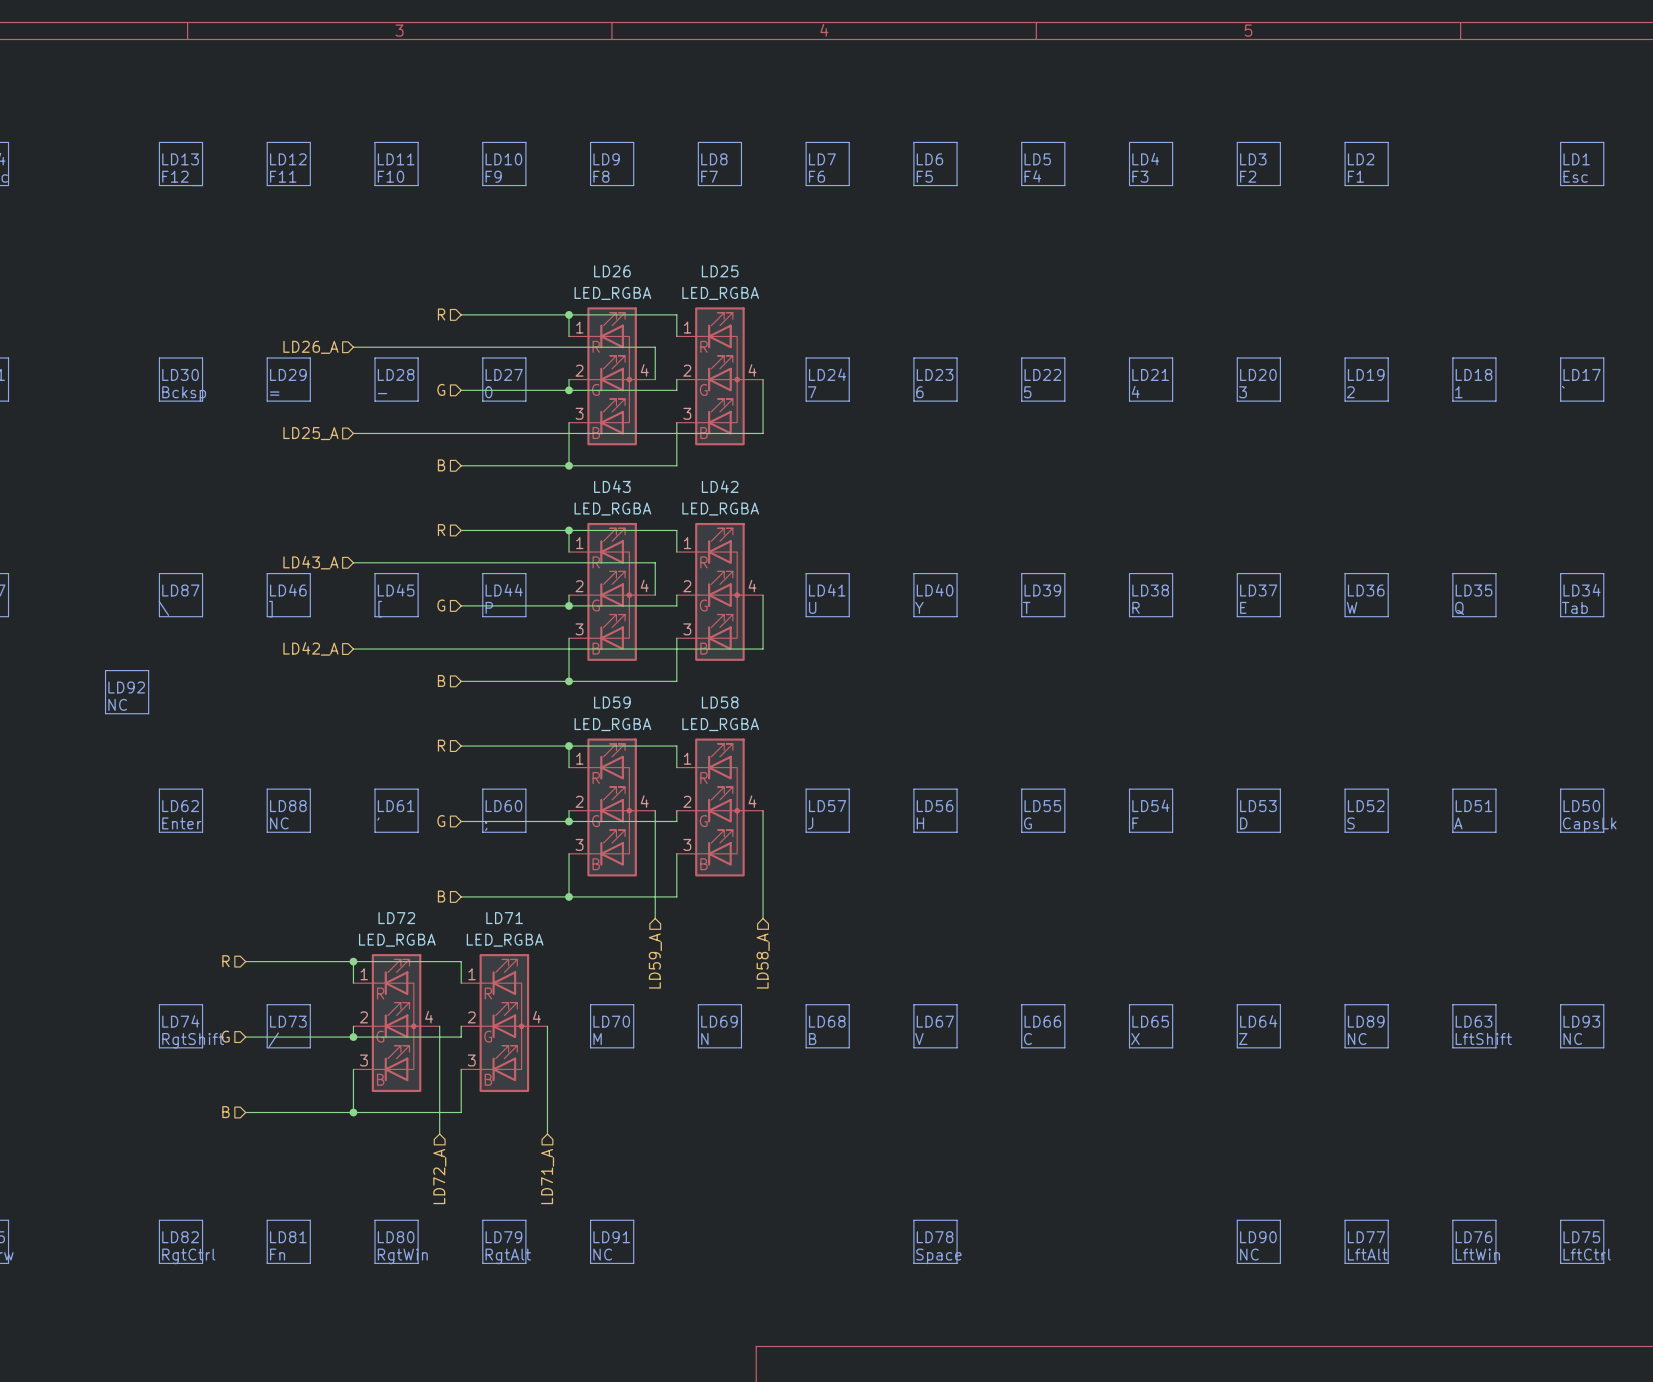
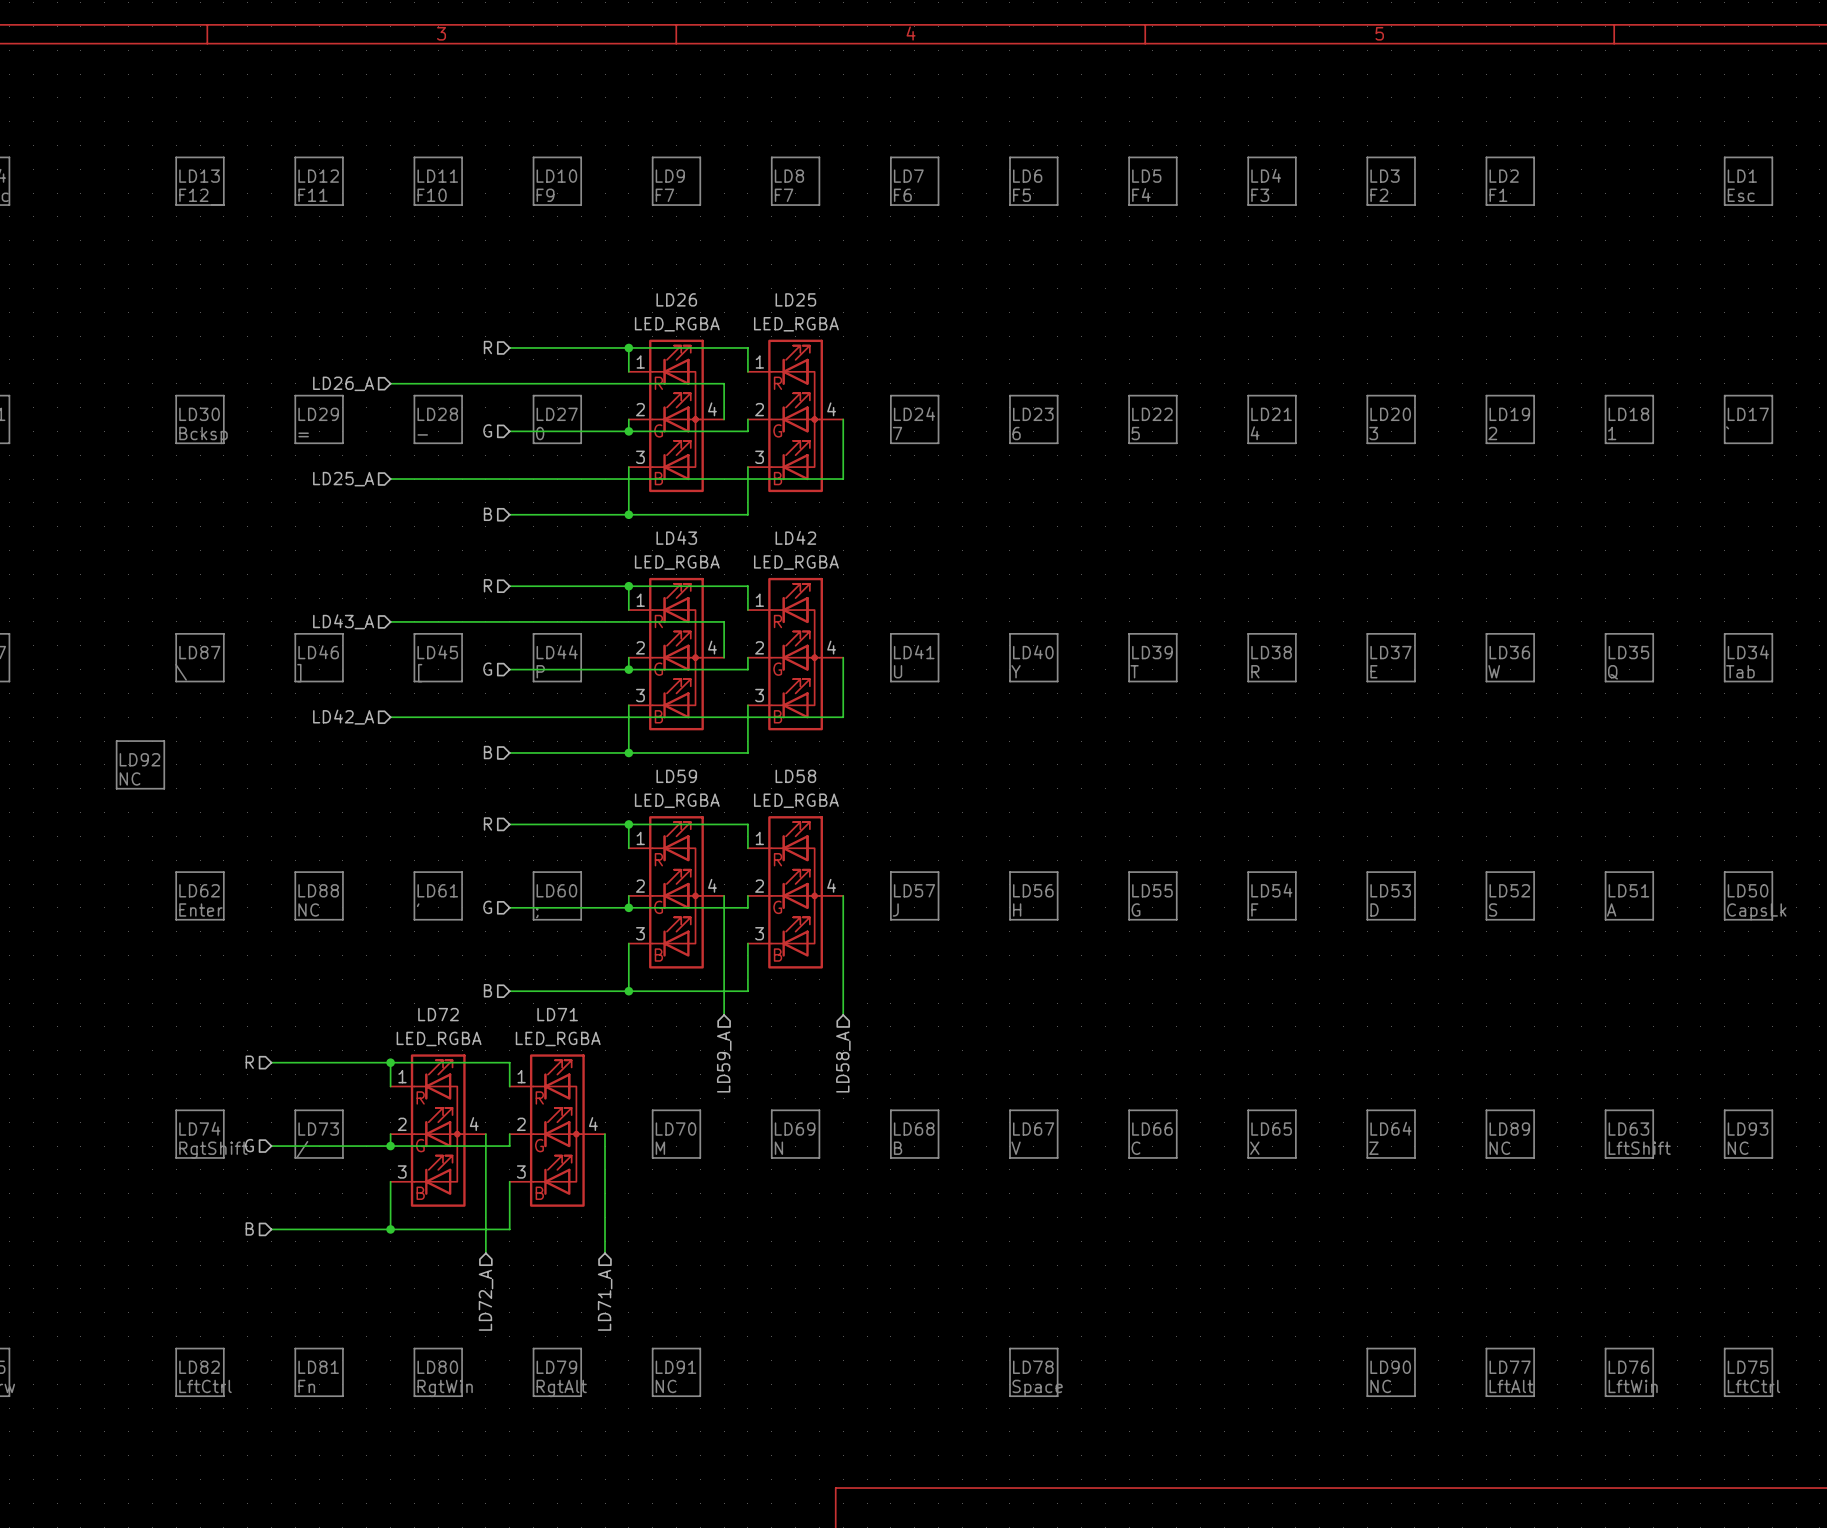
text: F8 (601, 176) -> F7 (664, 195)
text: RgtCtrl (188, 1256) -> LftCtrl (205, 1386)

